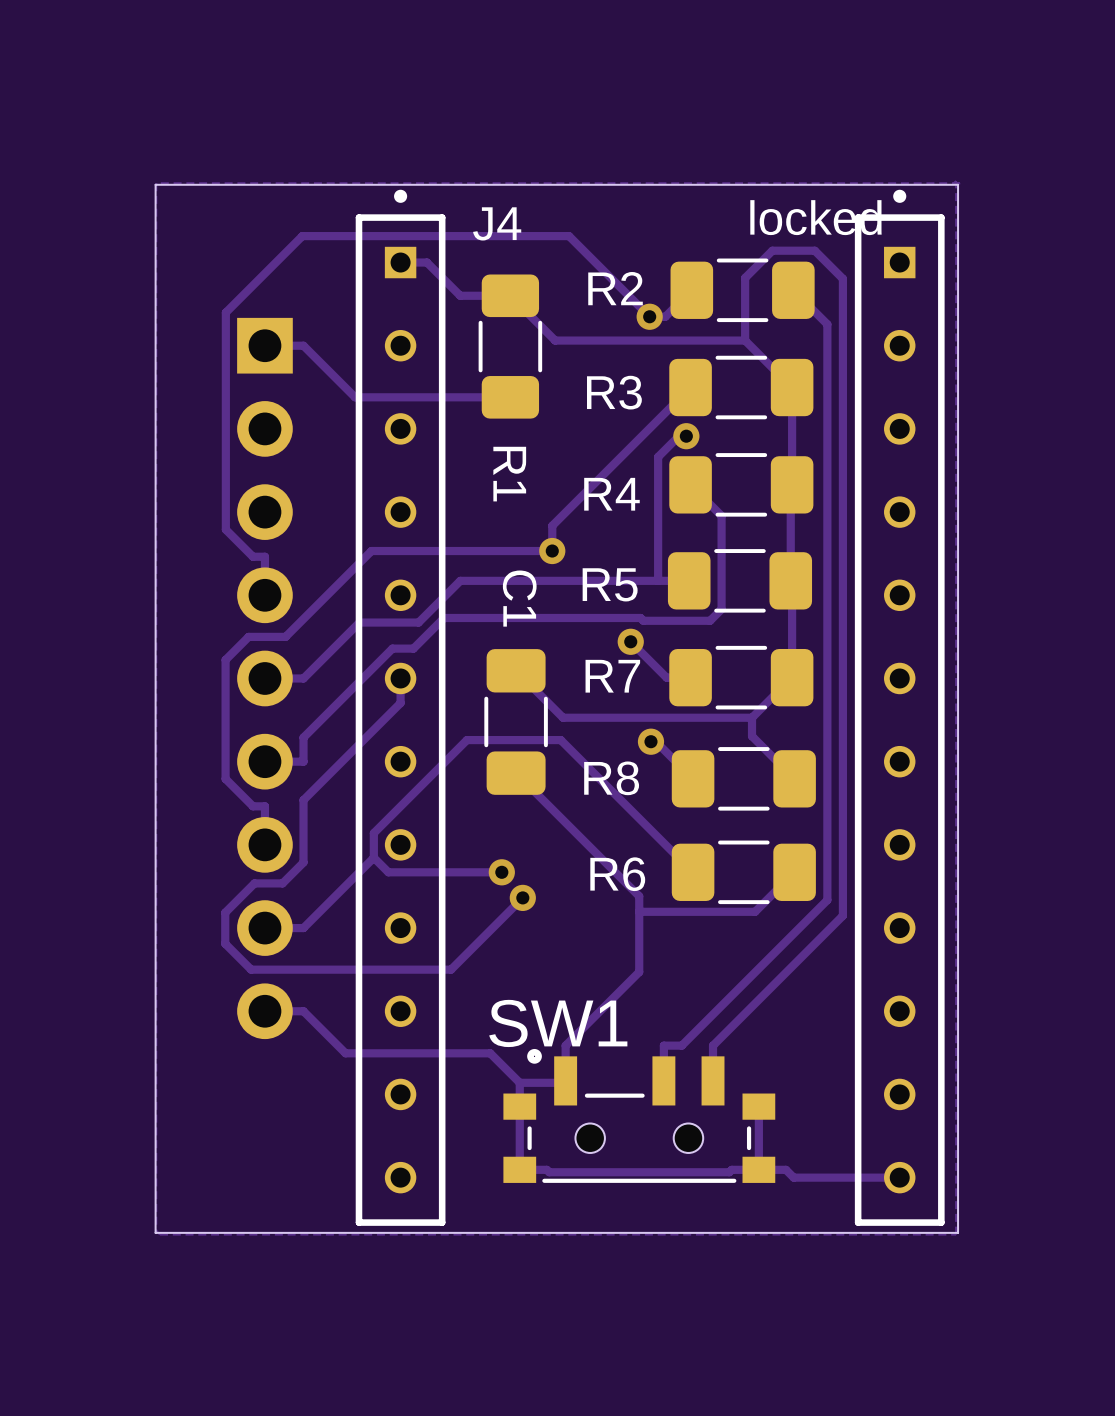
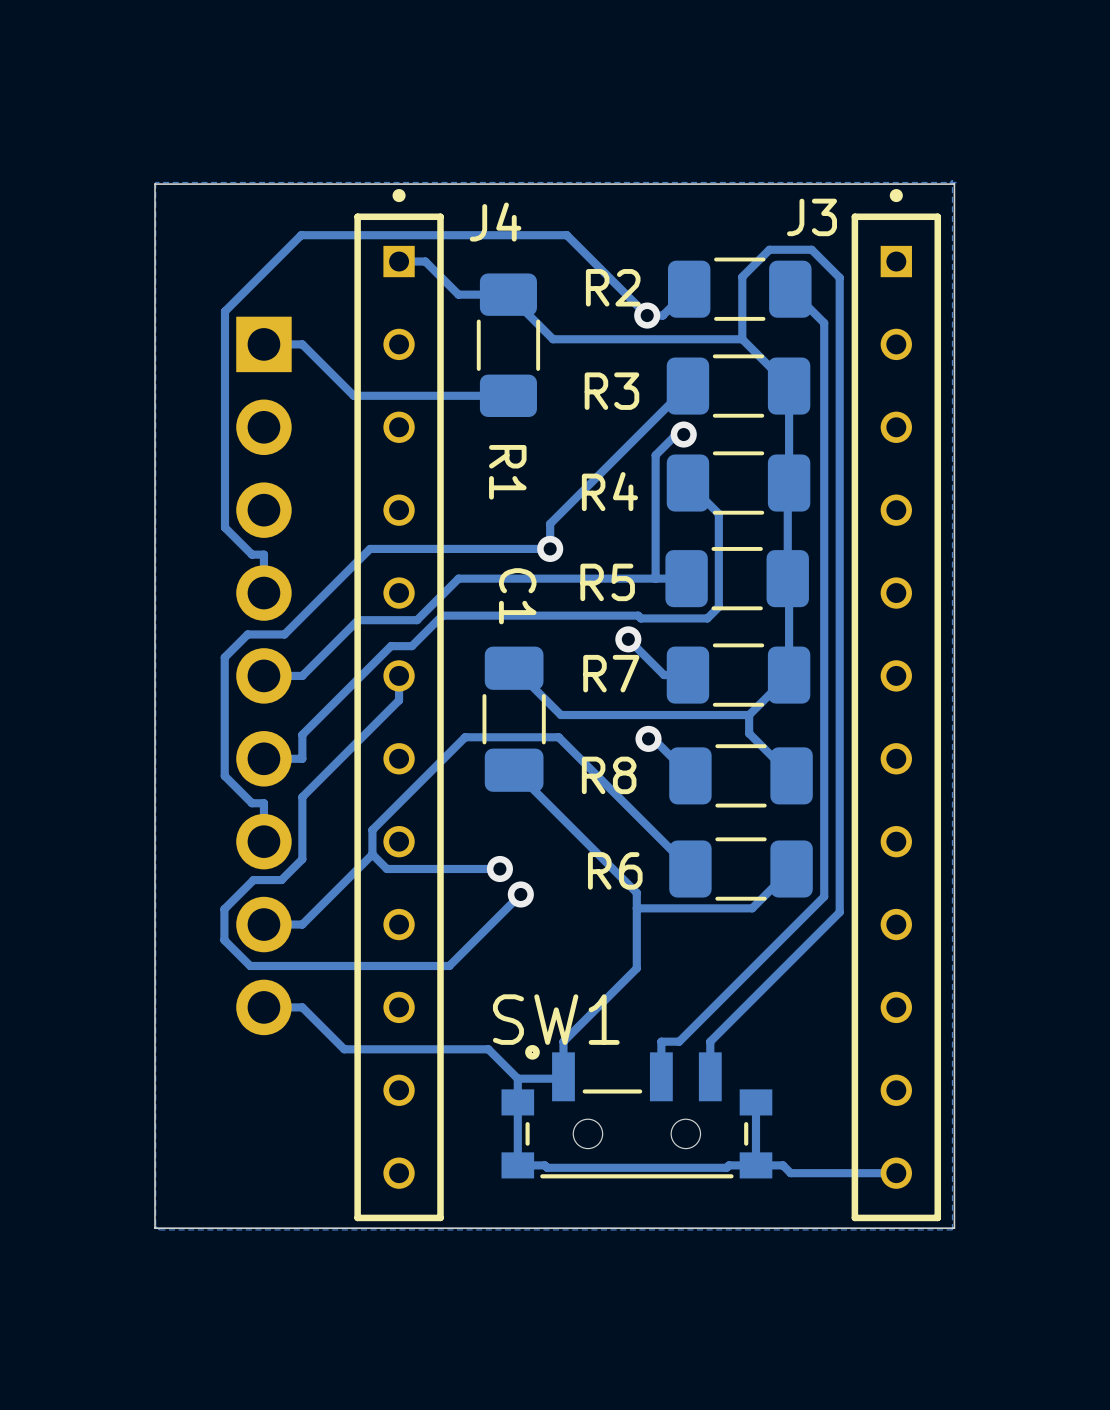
locked name: locked (815, 217) -> J3 (812, 217)

